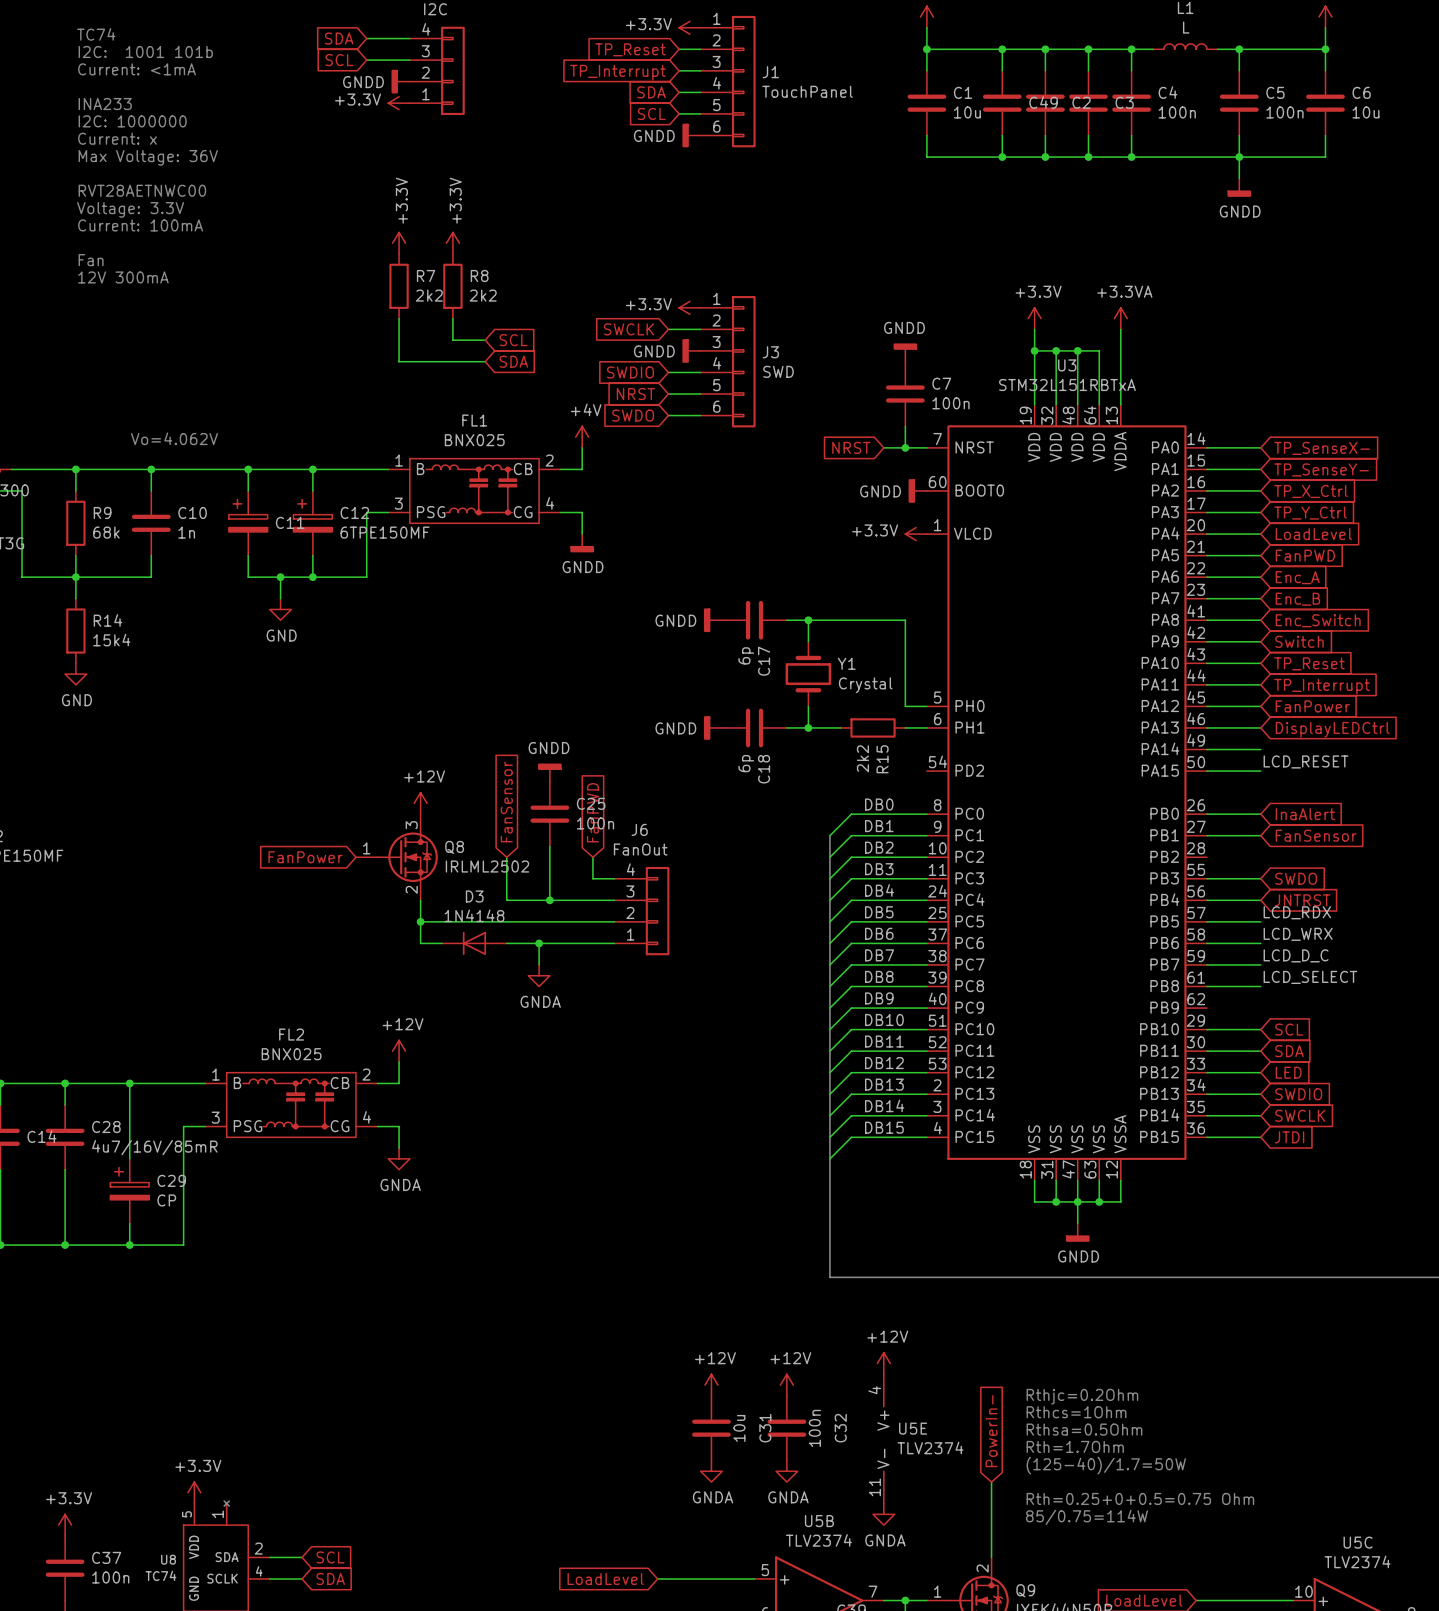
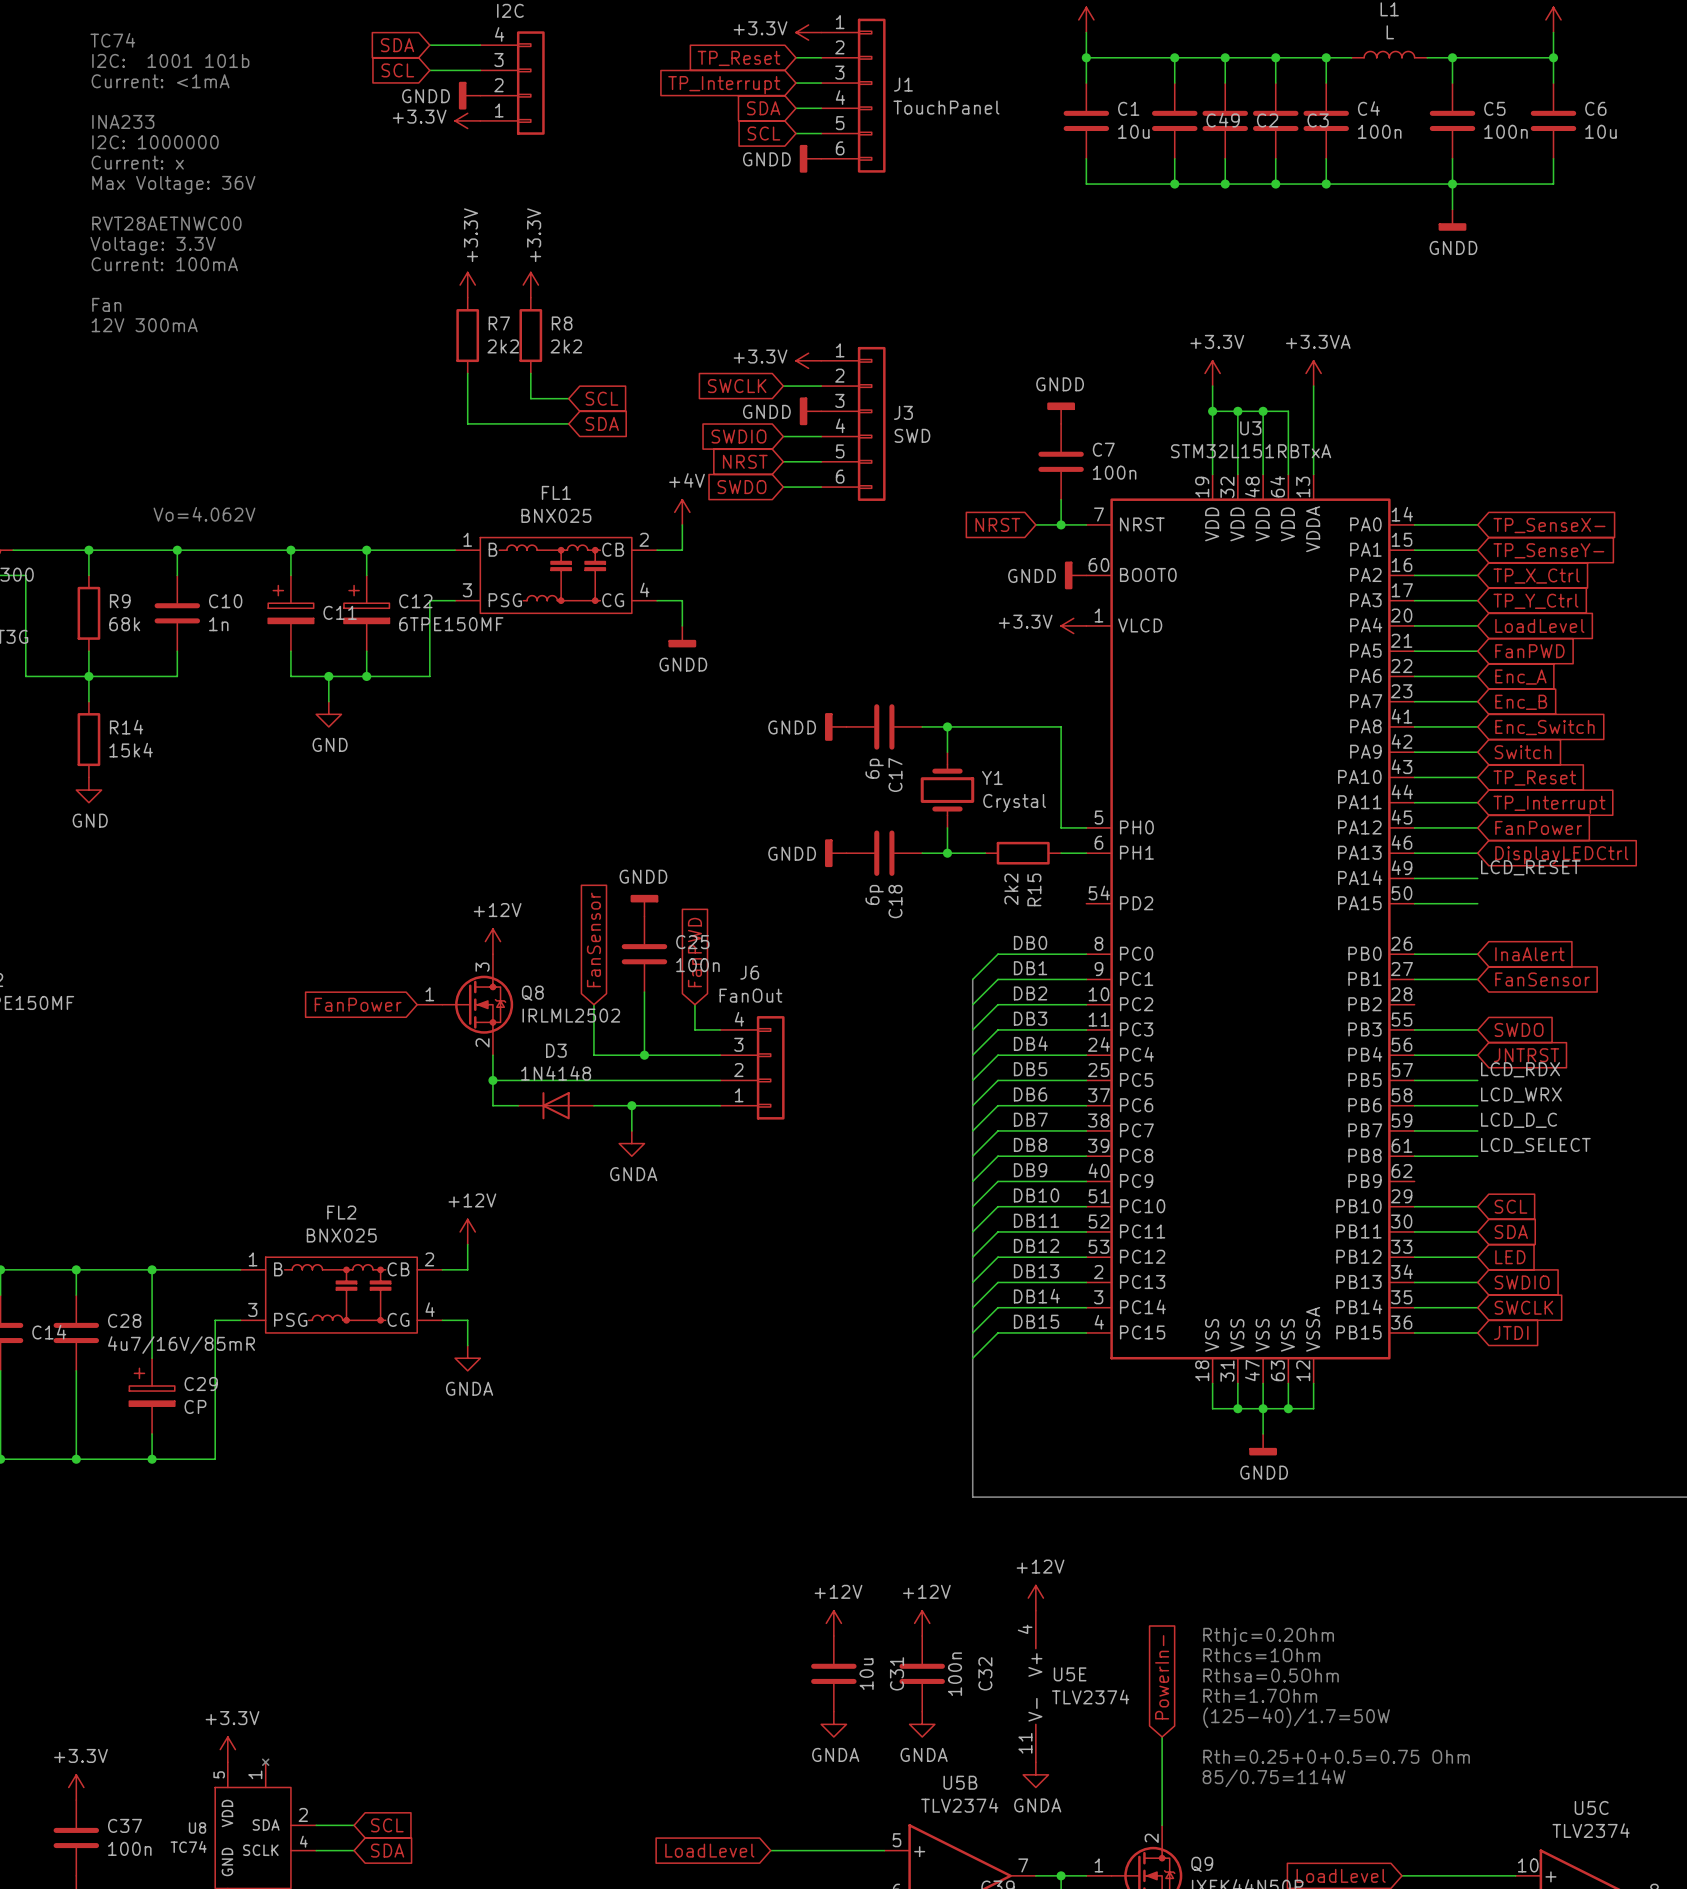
label position: LCD_RESET (1306, 761) -> LCD_RESET (1530, 867)

